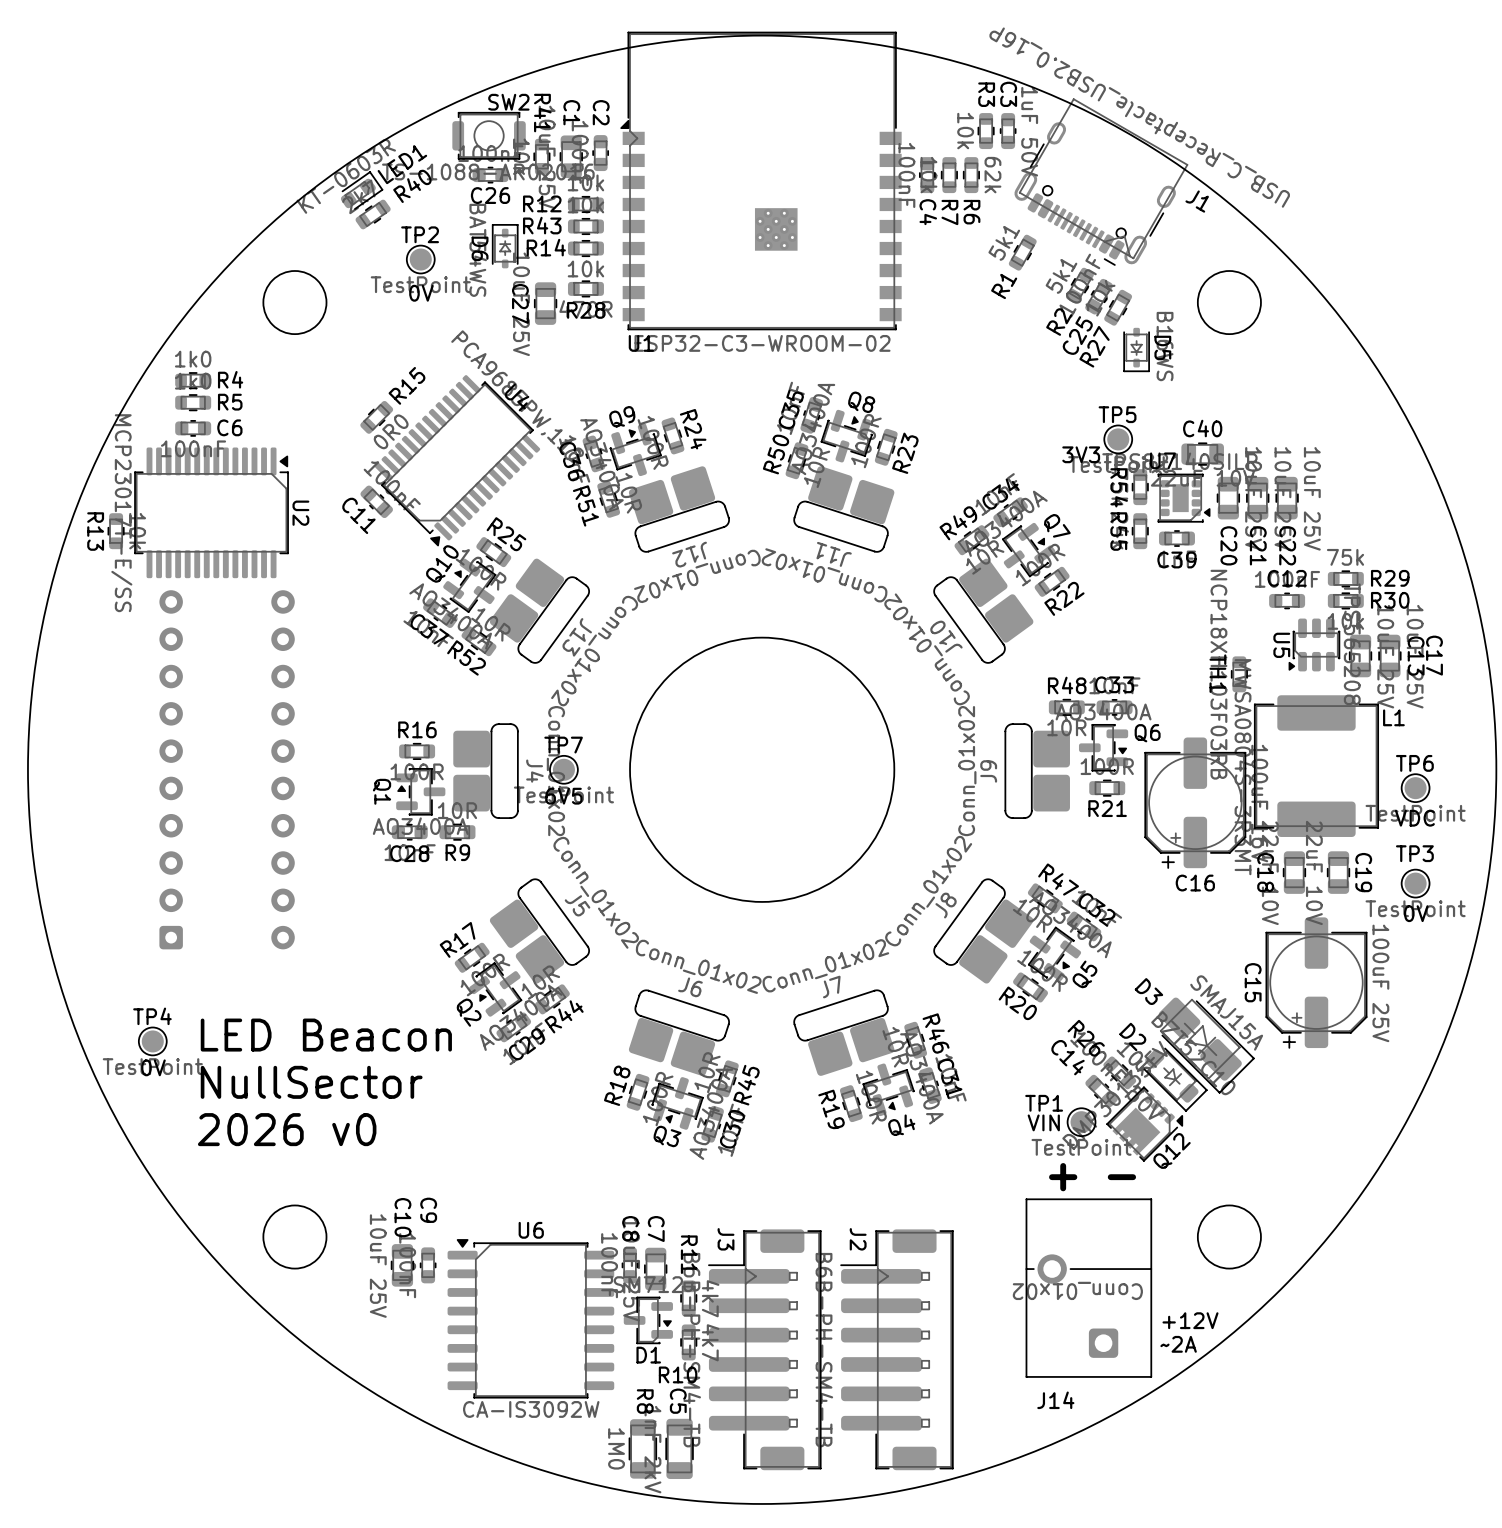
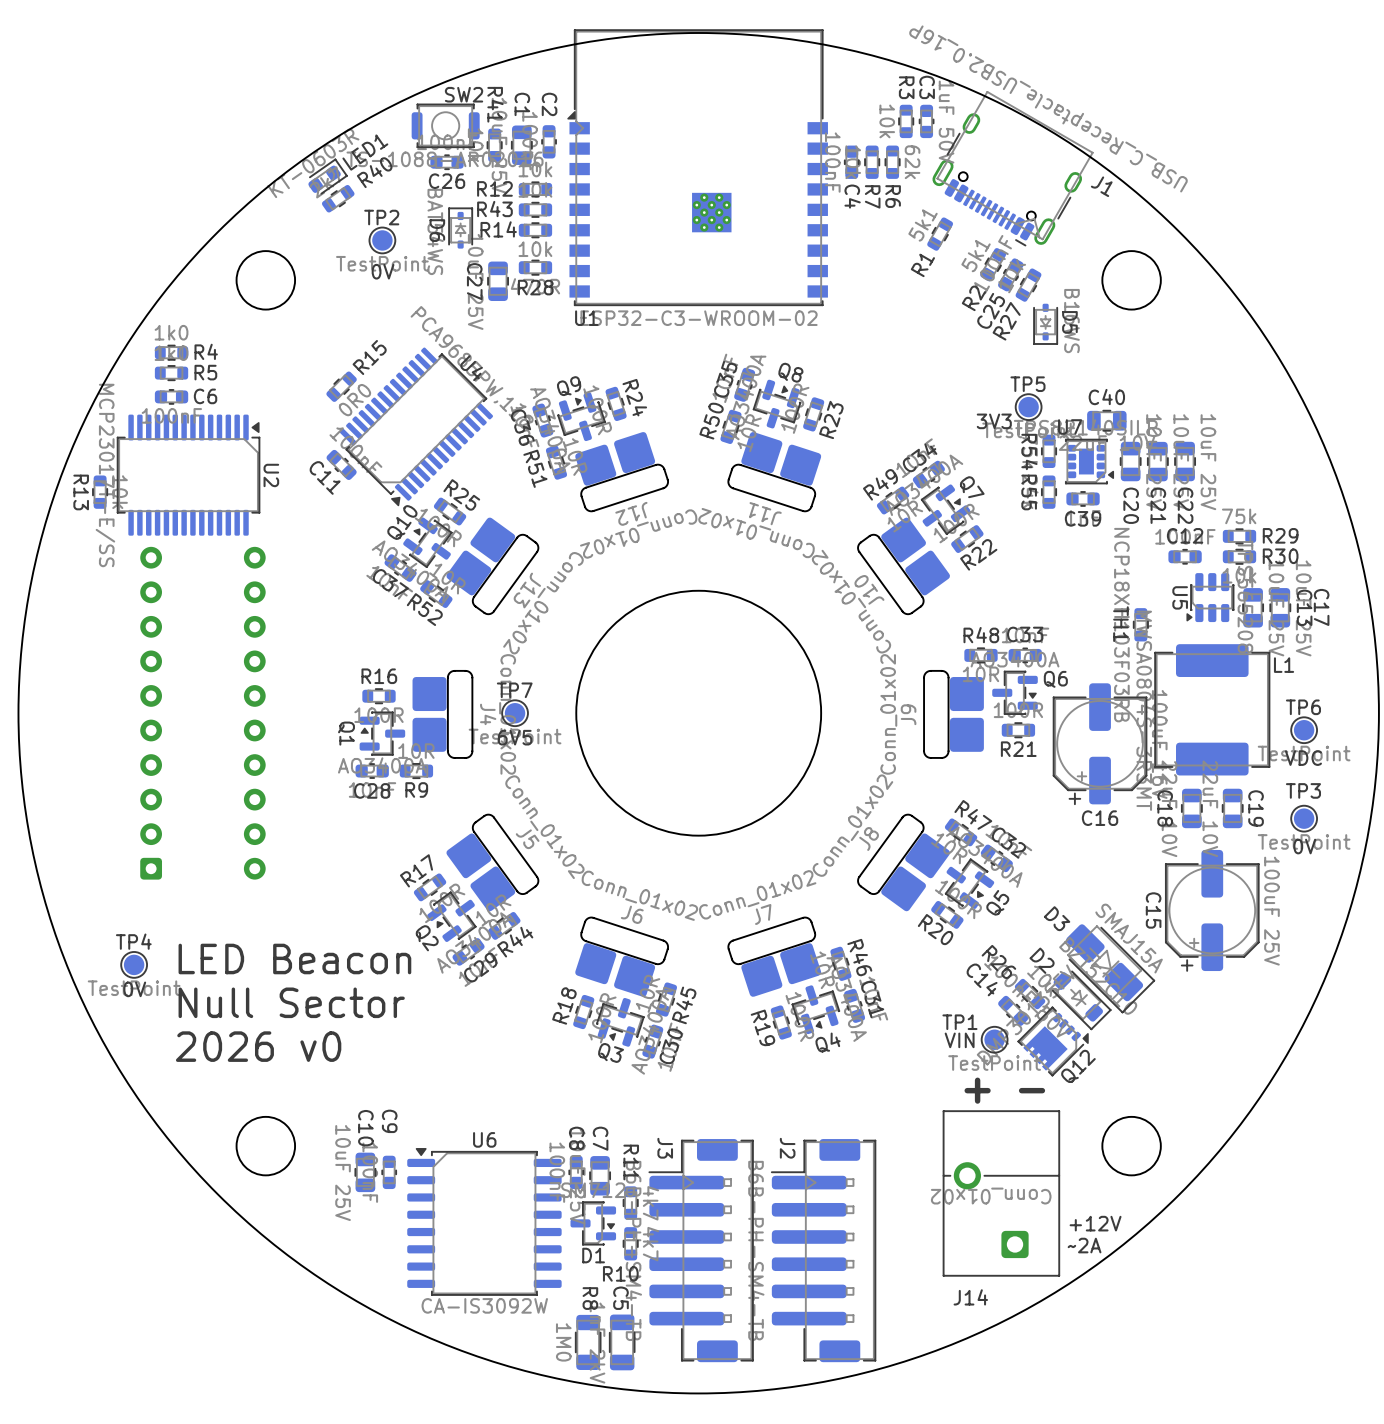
text: NullSector (311, 1082) -> Null Sector (291, 1002)

